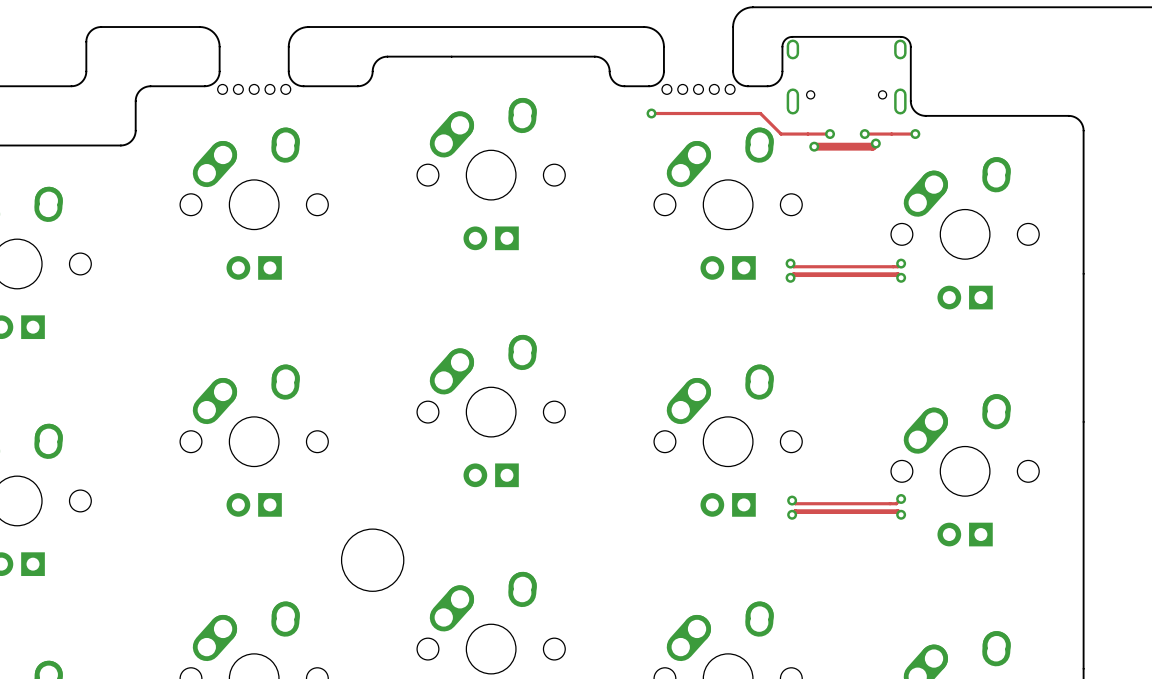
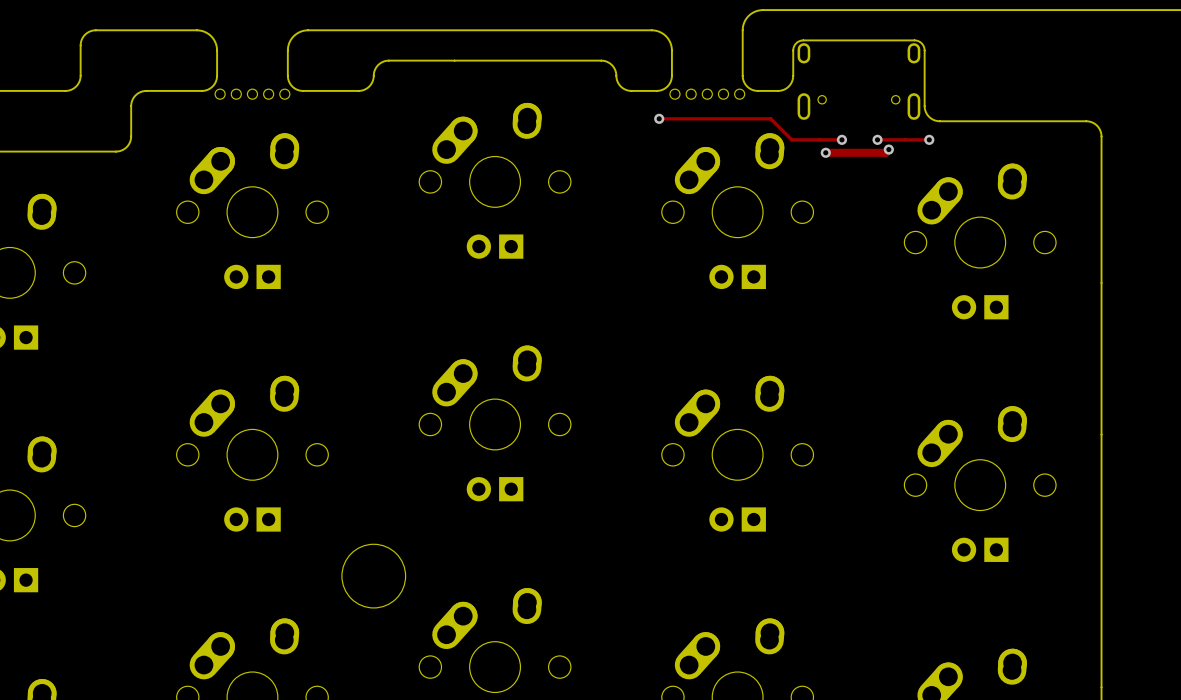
track: (790, 263) (793, 266) (897, 266) (901, 263) -> none
via: (790, 263) -> none
via: (901, 263) -> none
track: (790, 277) (793, 274) (897, 274) (901, 277) -> none
via: (790, 277) -> none
via: (901, 277) -> none
track: (901, 498) (896, 503) (795, 503) (792, 500) -> none
via: (901, 498) -> none
via: (792, 500) -> none
track: (792, 514) (795, 511) (897, 511) (901, 514) -> none
via: (792, 514) -> none
via: (901, 514) -> none

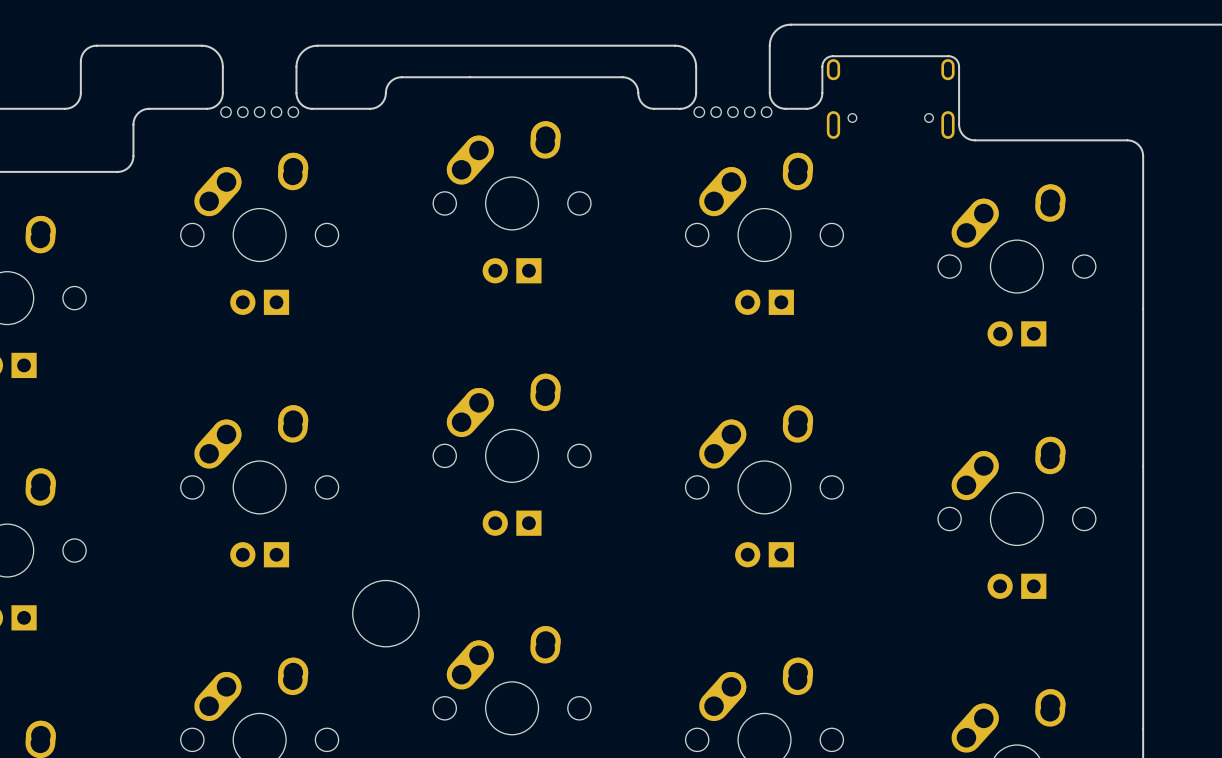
track: (659, 118) (770, 118) (791, 139) (841, 139) -> none
via: (659, 118) -> none
via: (841, 139) -> none
track: (877, 139) (929, 139) -> none
via: (877, 139) -> none
via: (929, 139) -> none
track: (888, 149) (885, 152) (825, 152) -> none
via: (888, 149) -> none
via: (825, 152) -> none

